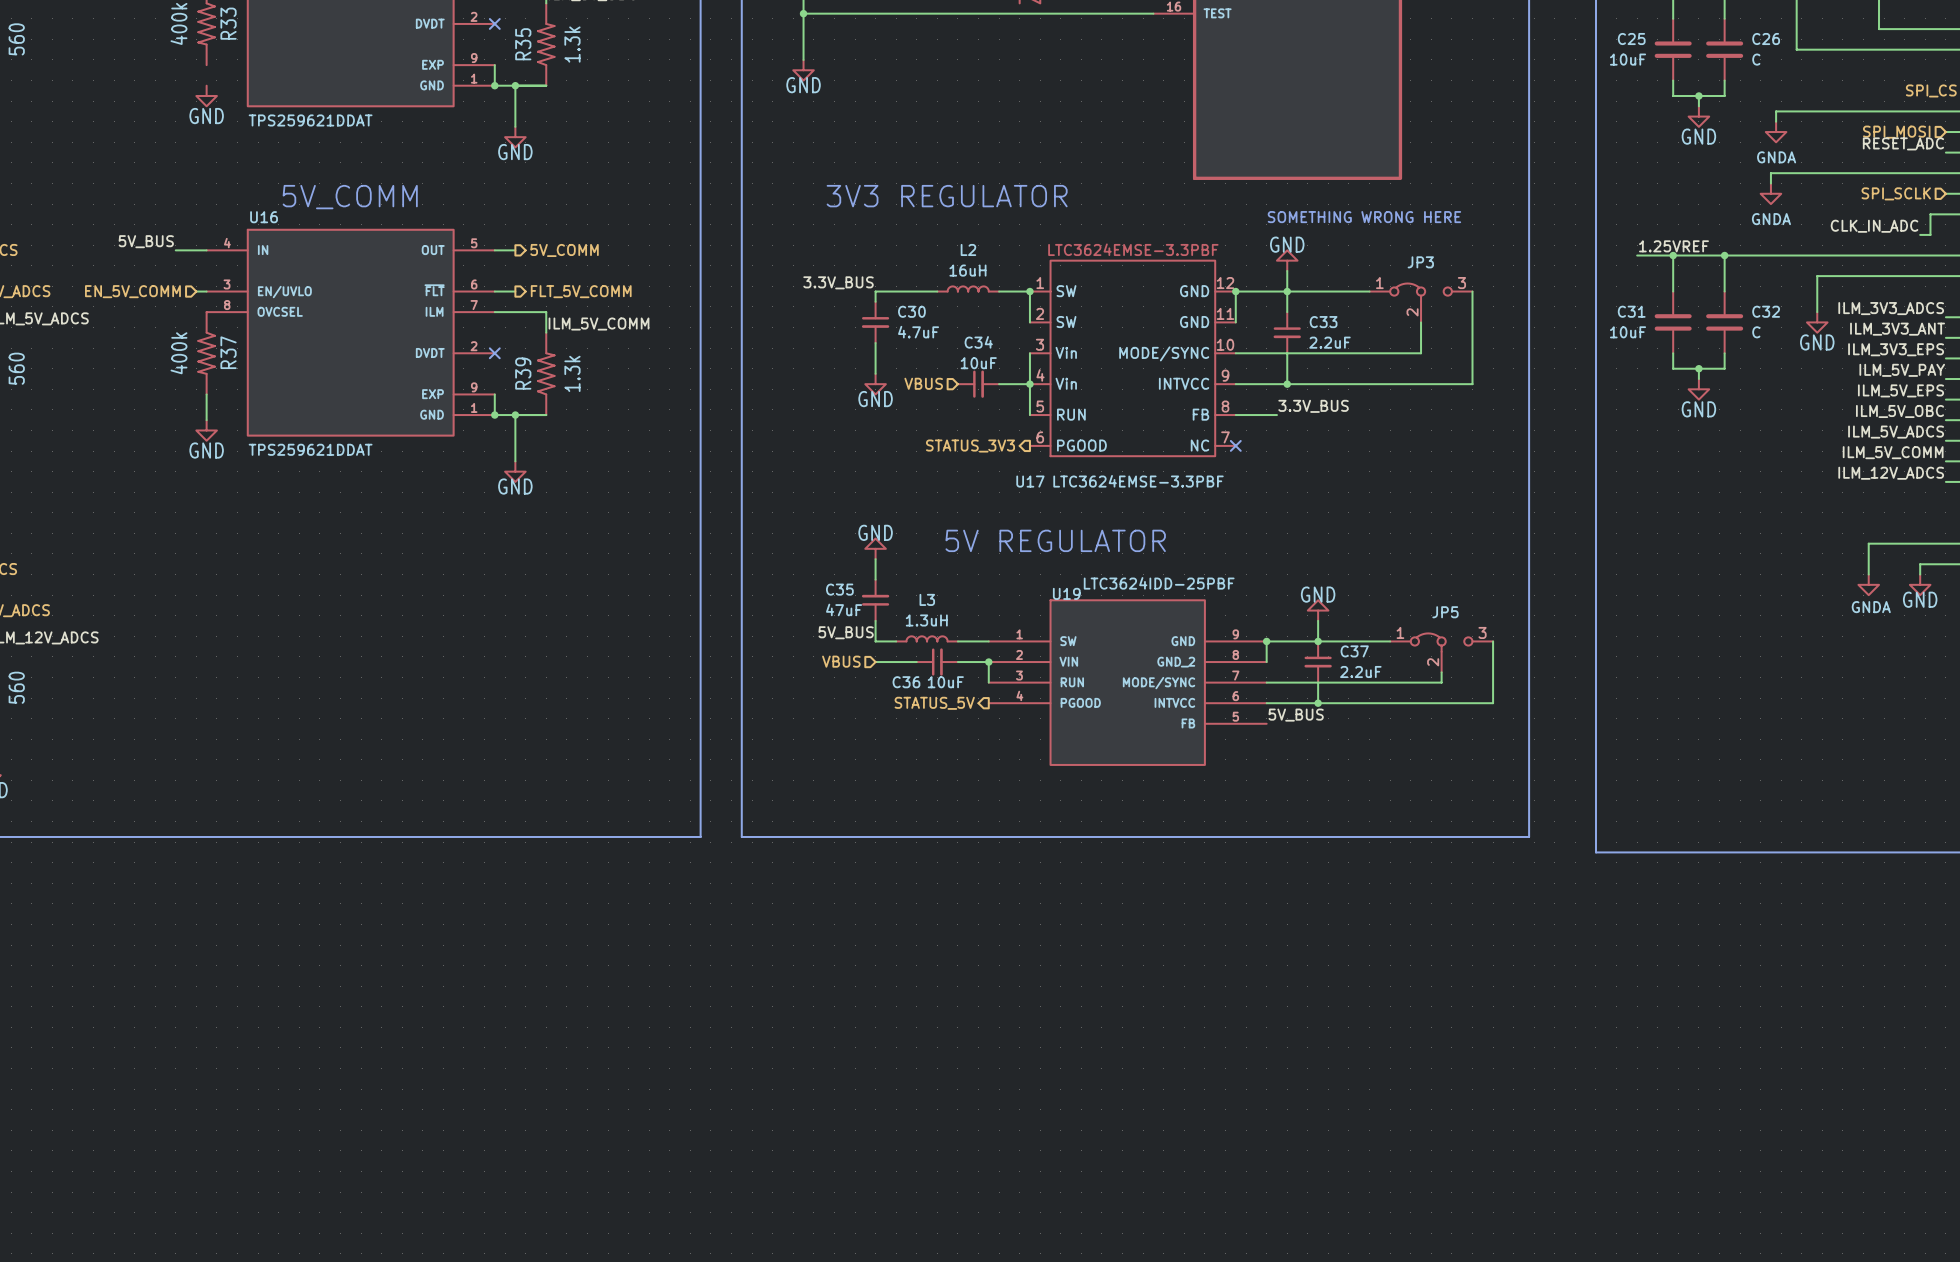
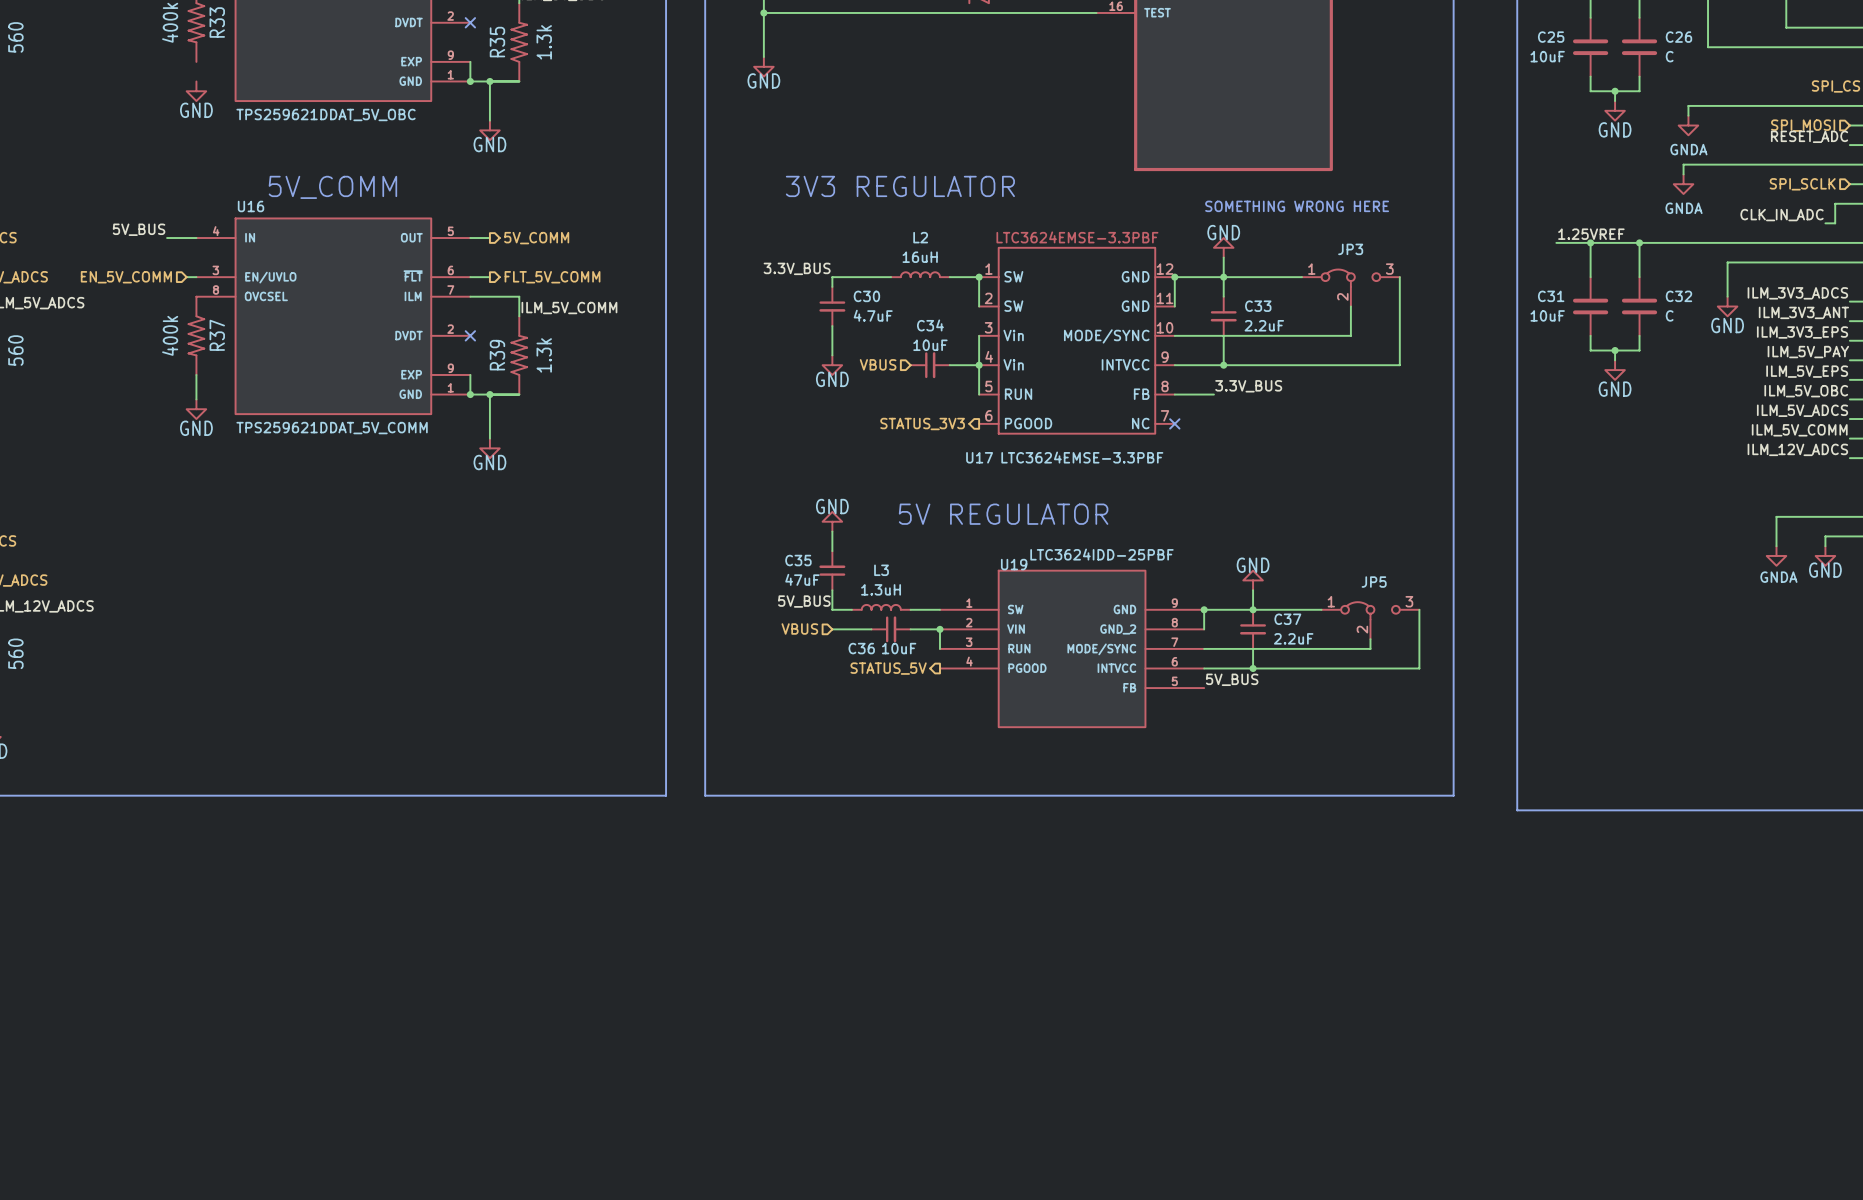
part value: TPS259621DDAT (310, 120) -> TPS259621DDAT_5V_OBC (326, 114)
U16 value: TPS259621DDAT (310, 449) -> TPS259621DDAT_5V_COMM (332, 428)

